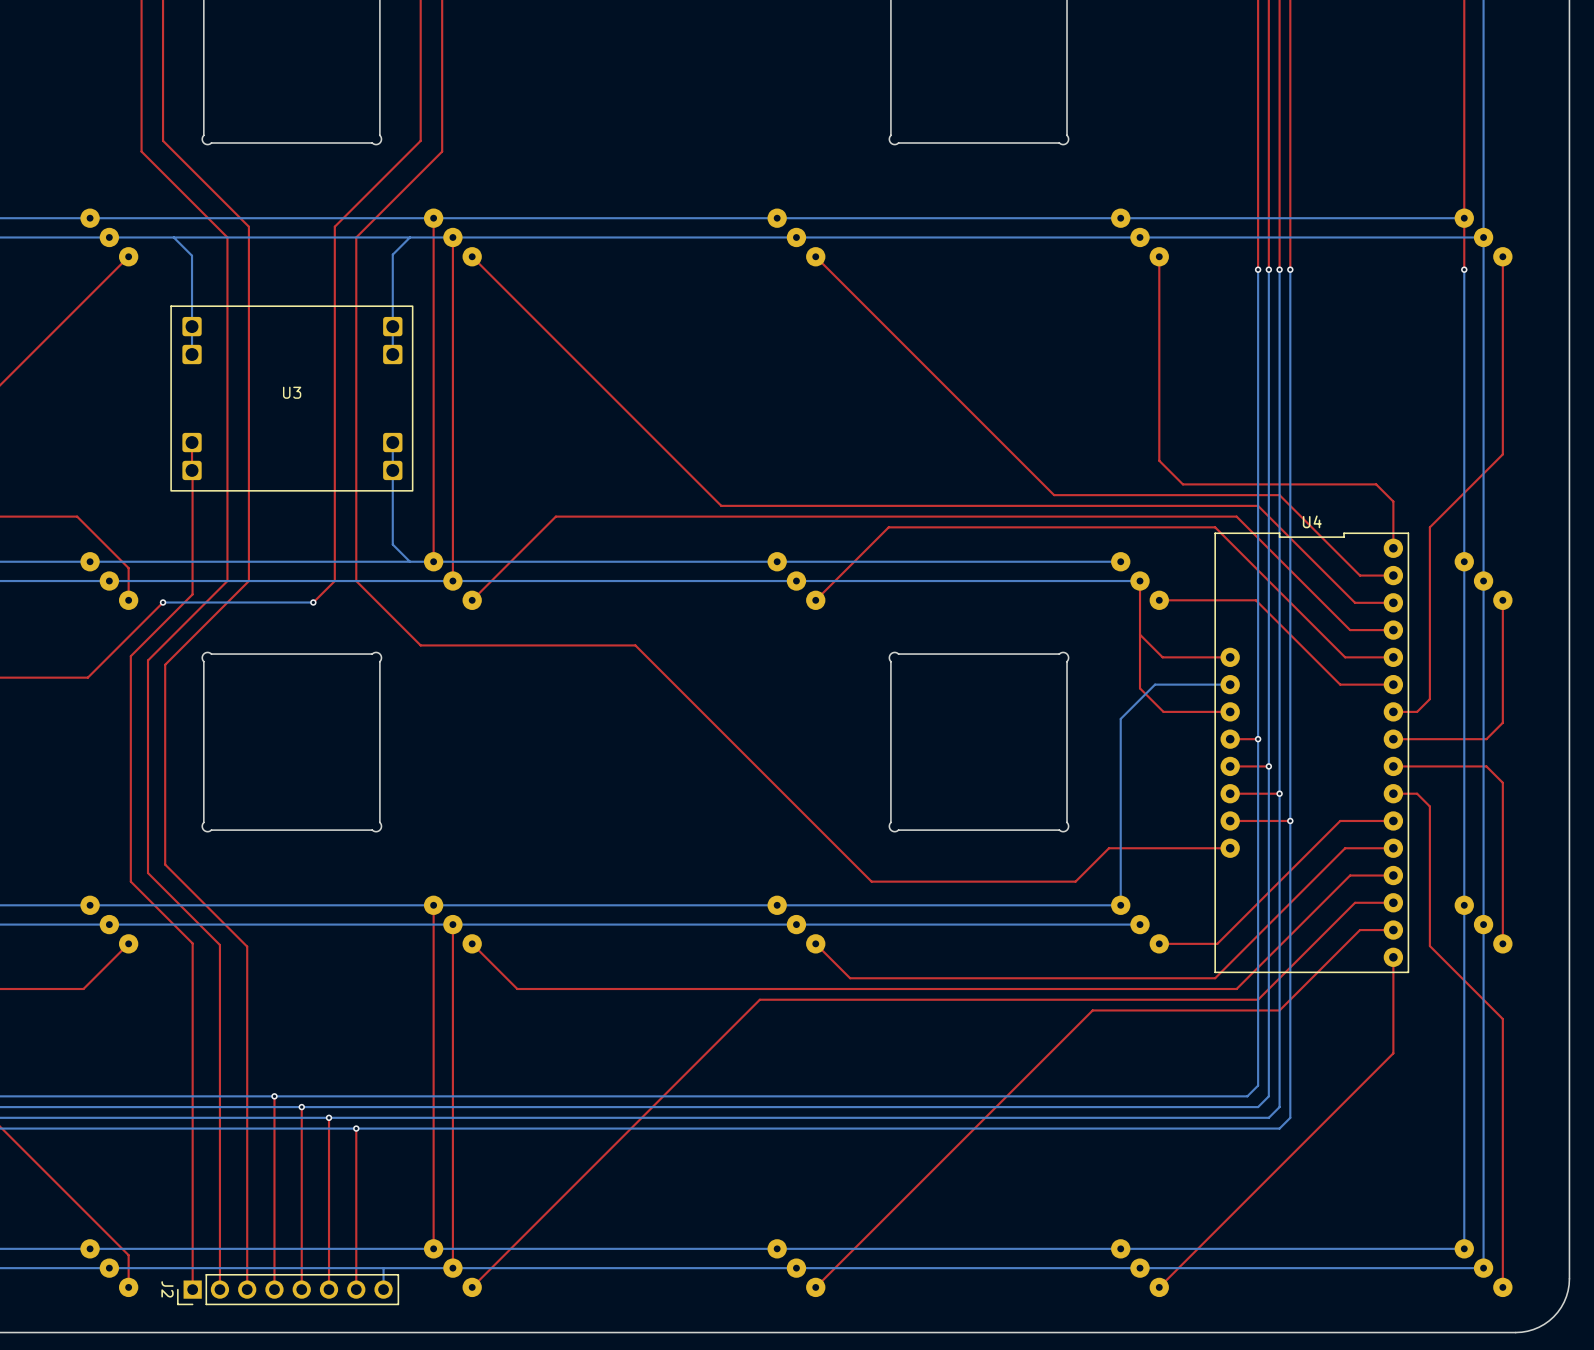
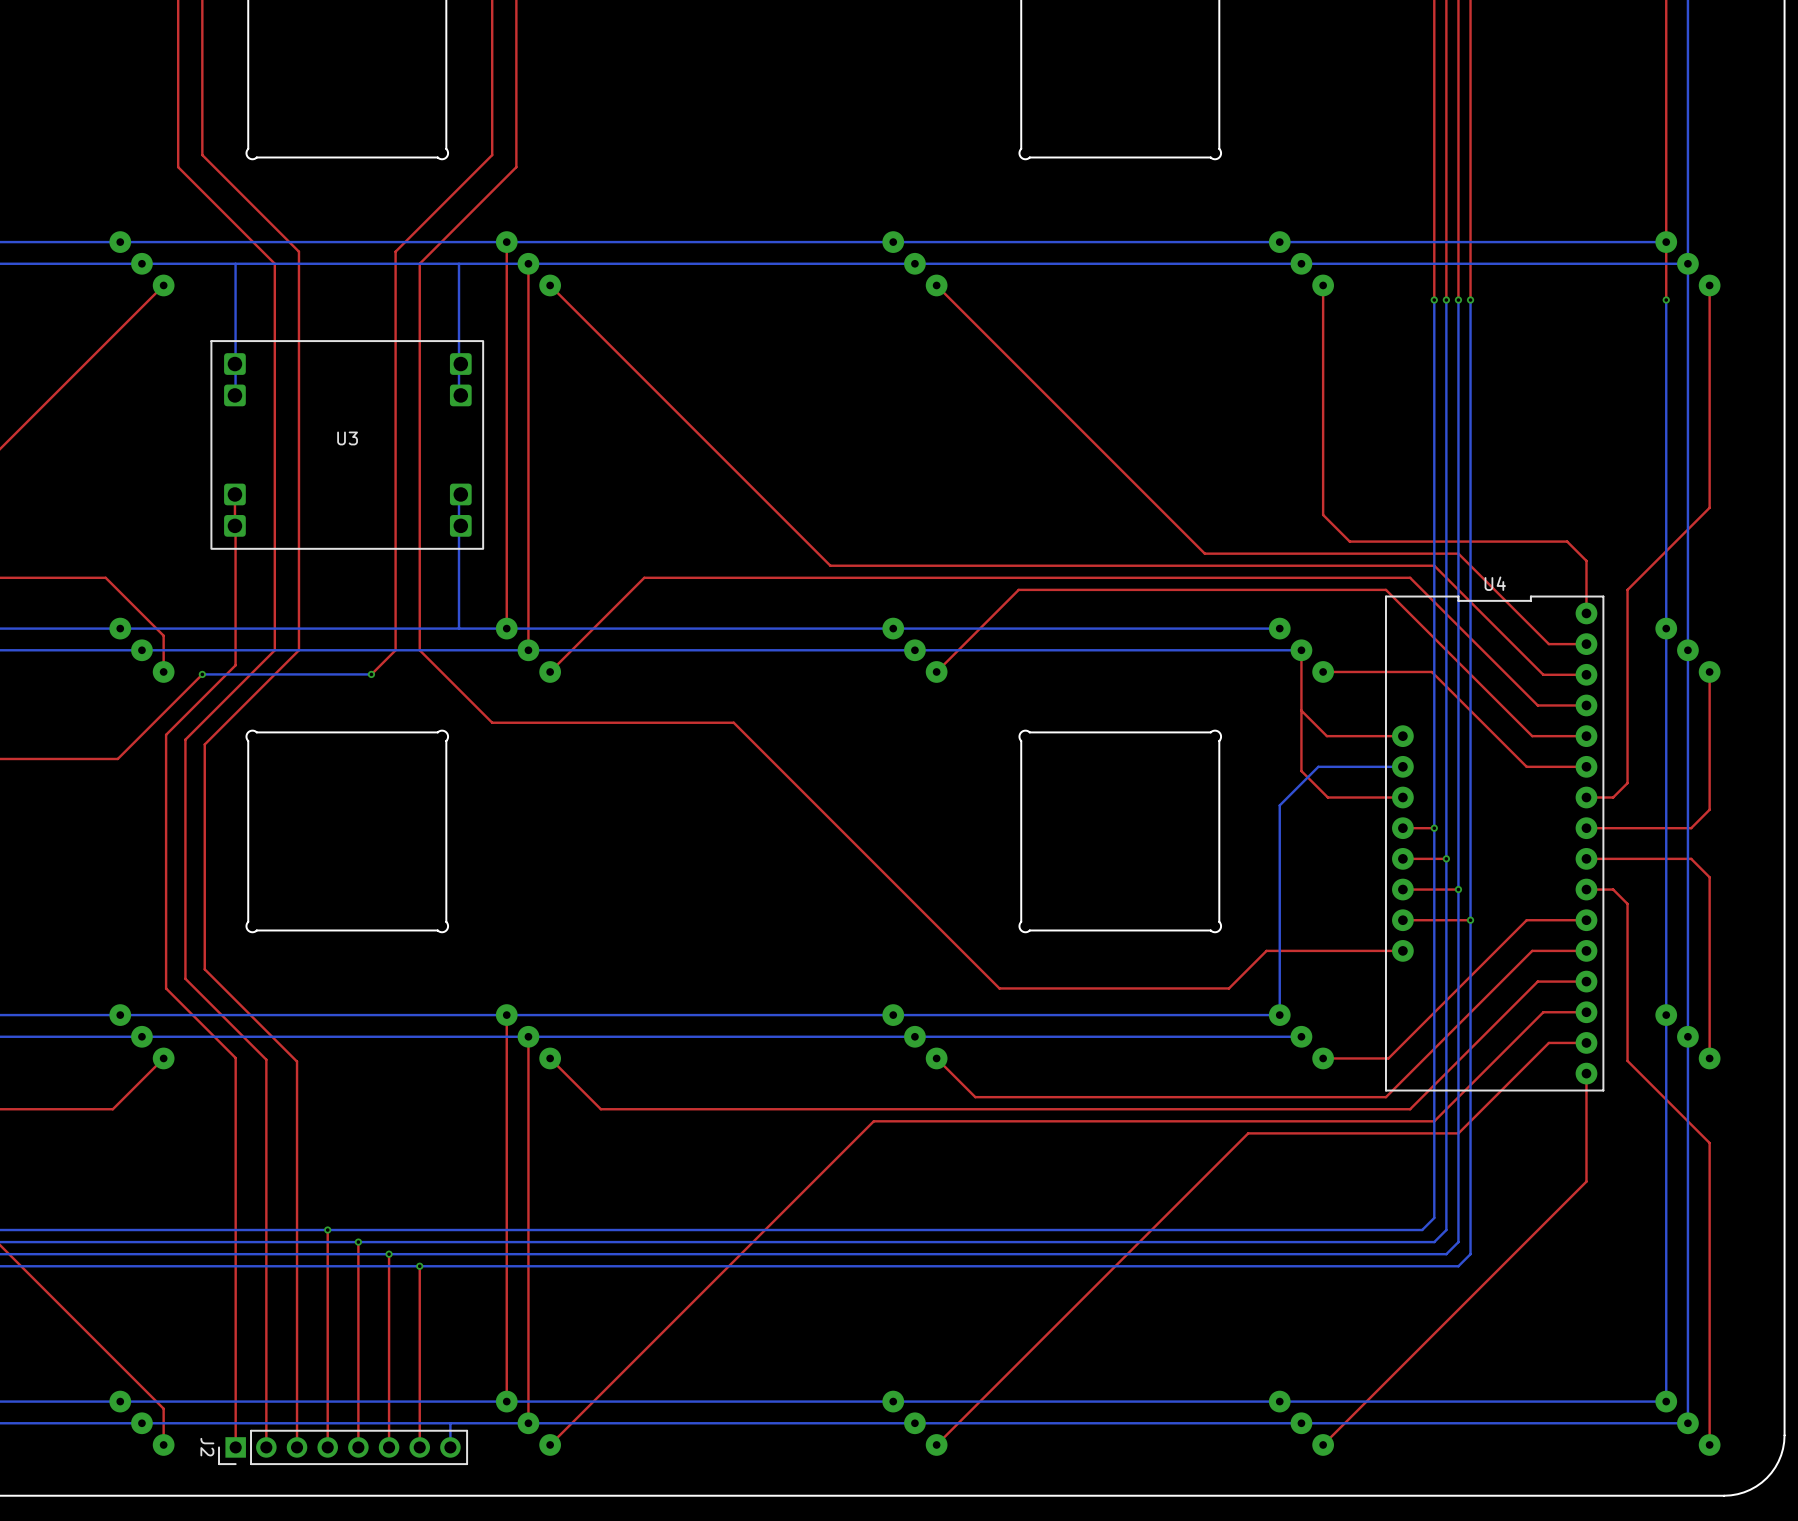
bottom track: (173, 237) (192, 255) (192, 354) -> none
bottom track: none -> (235, 263) (235, 395)
bottom track: none -> (459, 263) (459, 395)
bottom track: (409, 237) (392, 254) (392, 354) -> none
bottom track: none -> (459, 491) (459, 628)
bottom track: (392, 442) (392, 544) (409, 561) -> none

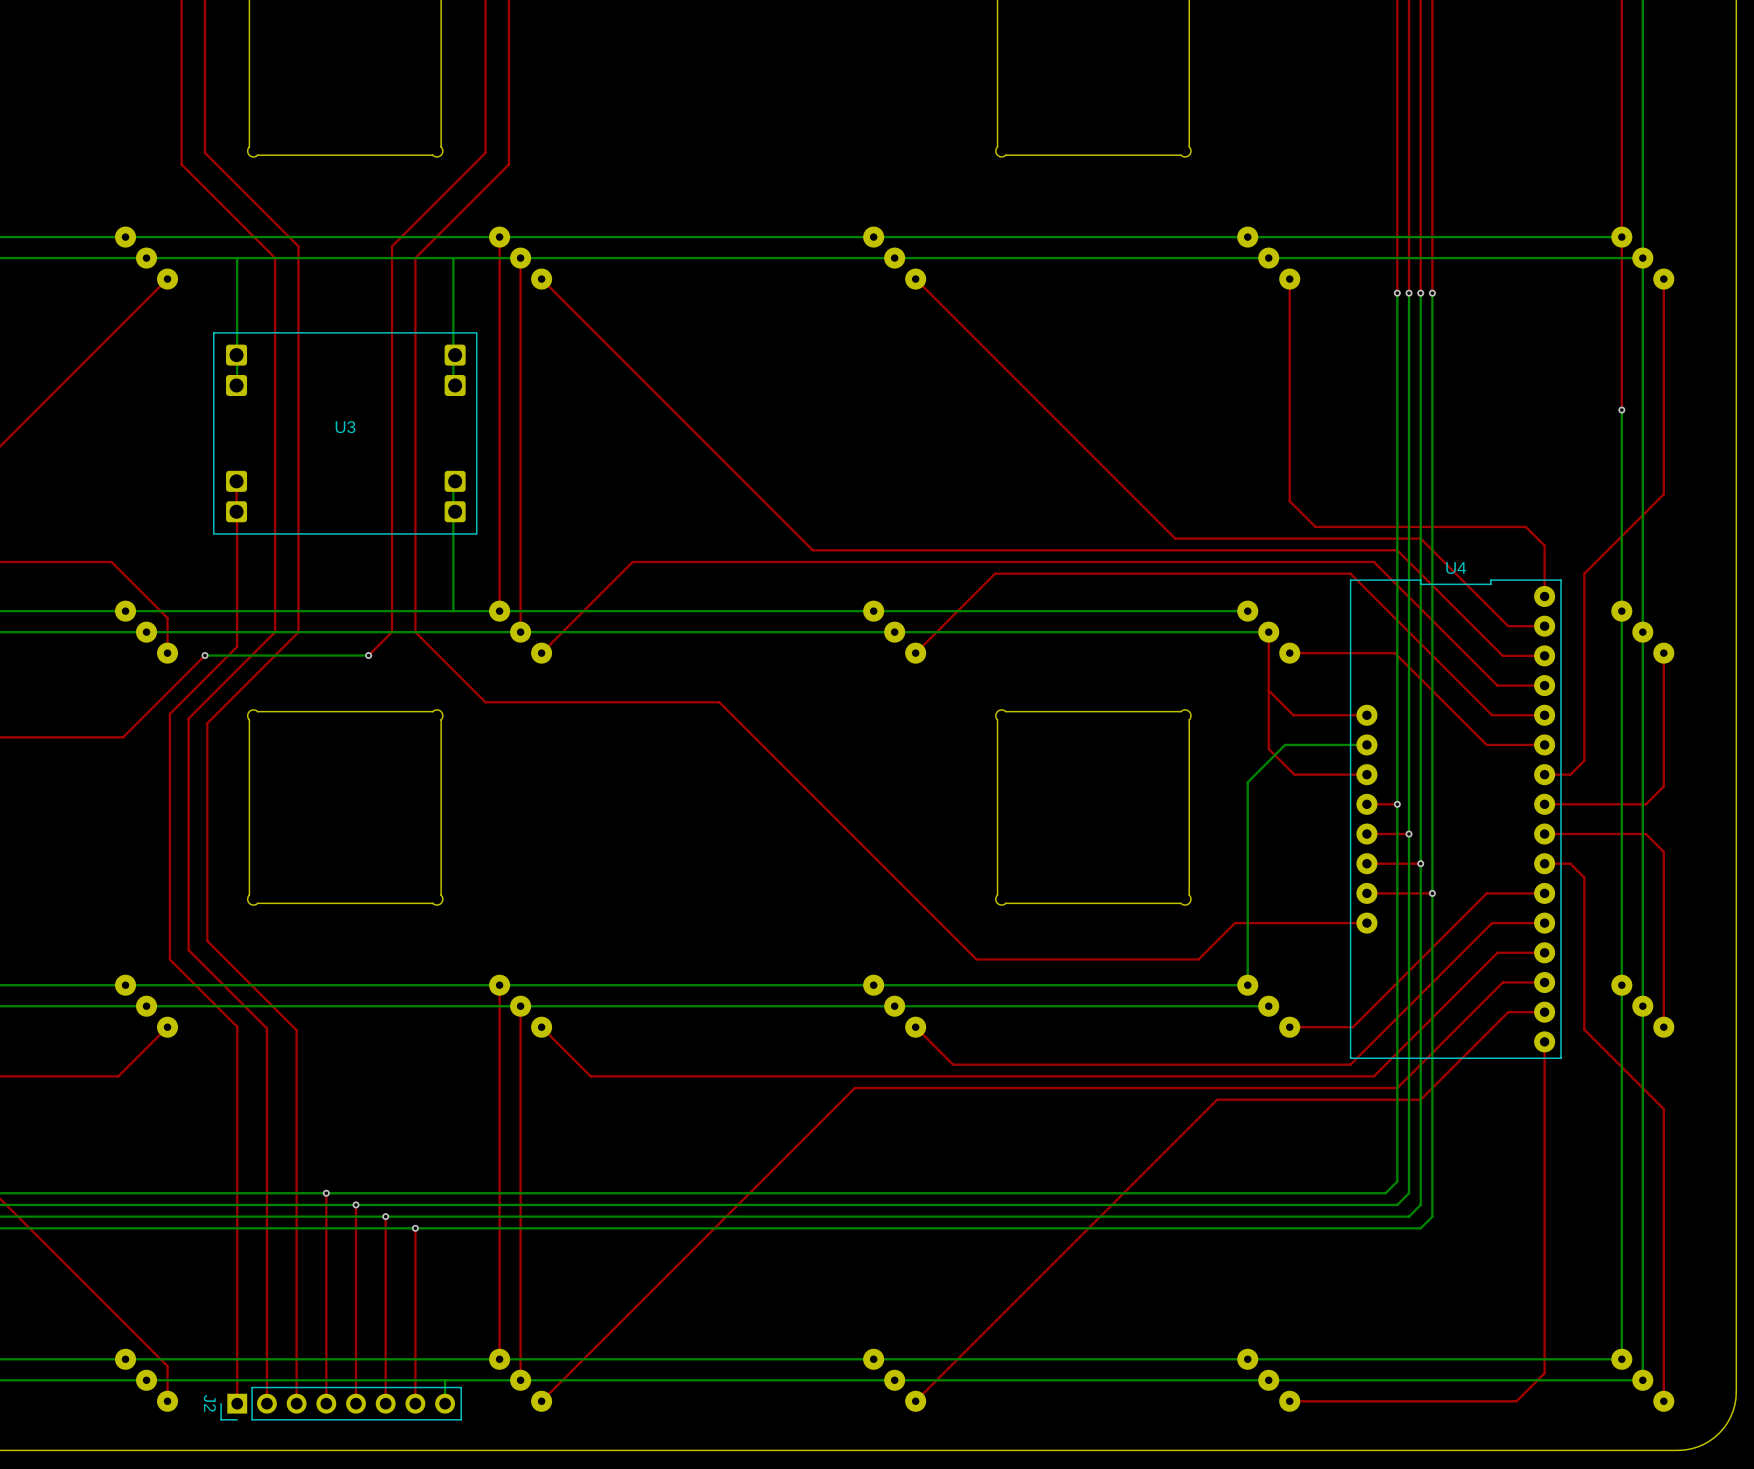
top track: none -> (1621, 293) (1621, 410)
bottom track: (1666, 300) (1666, 420) -> none
via: (1666, 300) -> none
via: none -> (1621, 410)
top track: (1586, 1181) (1323, 1444) -> (1544, 1146) (1544, 1373) (1516, 1401) (1289, 1401)

